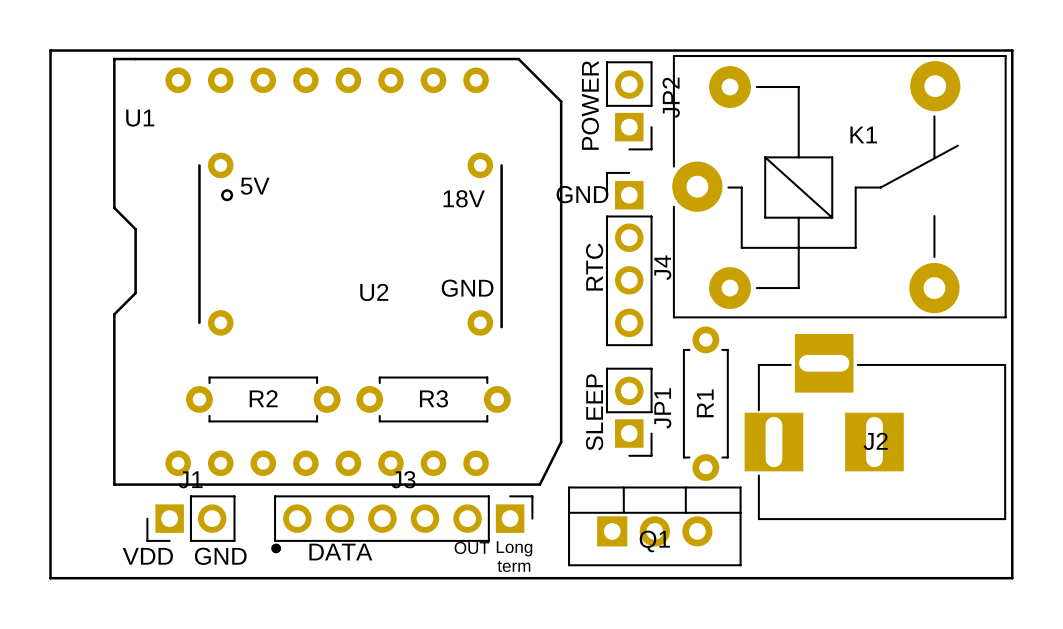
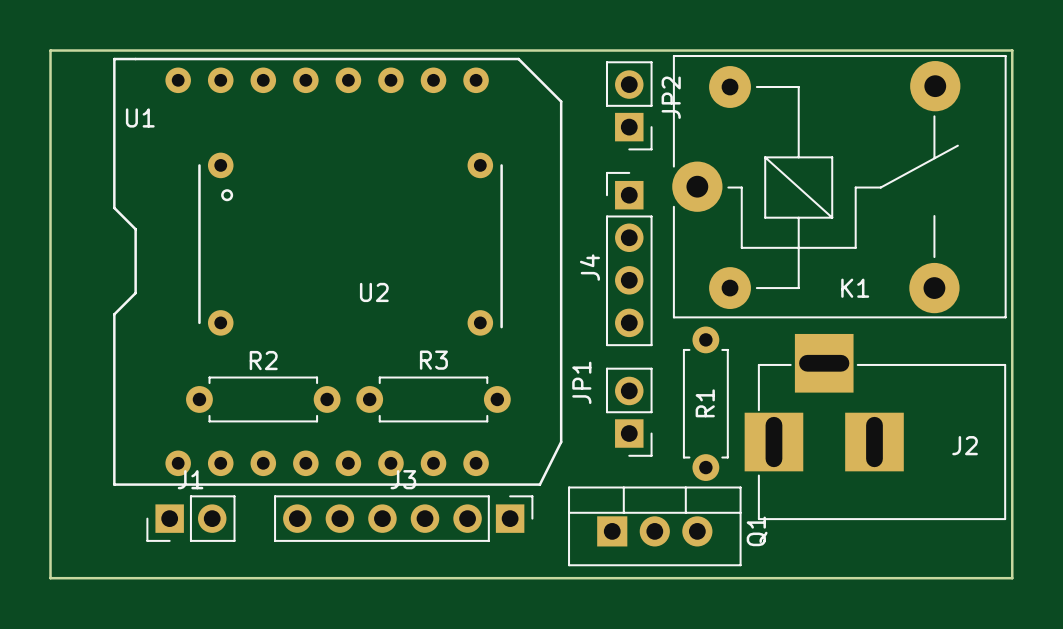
text: POWER (590, 105) -> none
K1 name position: K1 (863, 135) -> K1 (855, 288)
text: 5V (255, 186) -> none
text: GND (582, 194) -> none
text: 18V (464, 198) -> none
text: RTC (594, 267) -> none
J4 name position: J4 (662, 267) -> J4 (589, 267)
text: GND (467, 288) -> none
R2 name position: R2 (263, 398) -> R2 (263, 360)
R3 name position: R3 (433, 398) -> R3 (433, 360)
JP1 name position: JP1 (662, 408) -> JP1 (581, 382)
text: SLEEP (594, 412) -> none
J2 name position: J2 (875, 441) -> J2 (965, 445)
Q1 name rotation: 0° (654, 541) -> 90° counterclockwise (757, 531)
Q1 name position: Q1 (654, 541) -> Q1 (757, 531)
text: OUT (472, 547) -> none
line: (276, 548) (276, 549) (275, 548) (276, 547) (276, 548) -> none
text: Long (514, 548) -> none
text: DATA (340, 552) -> none
text: VDD (147, 556) -> none
text: GND (220, 556) -> none
text: term (513, 566) -> none

